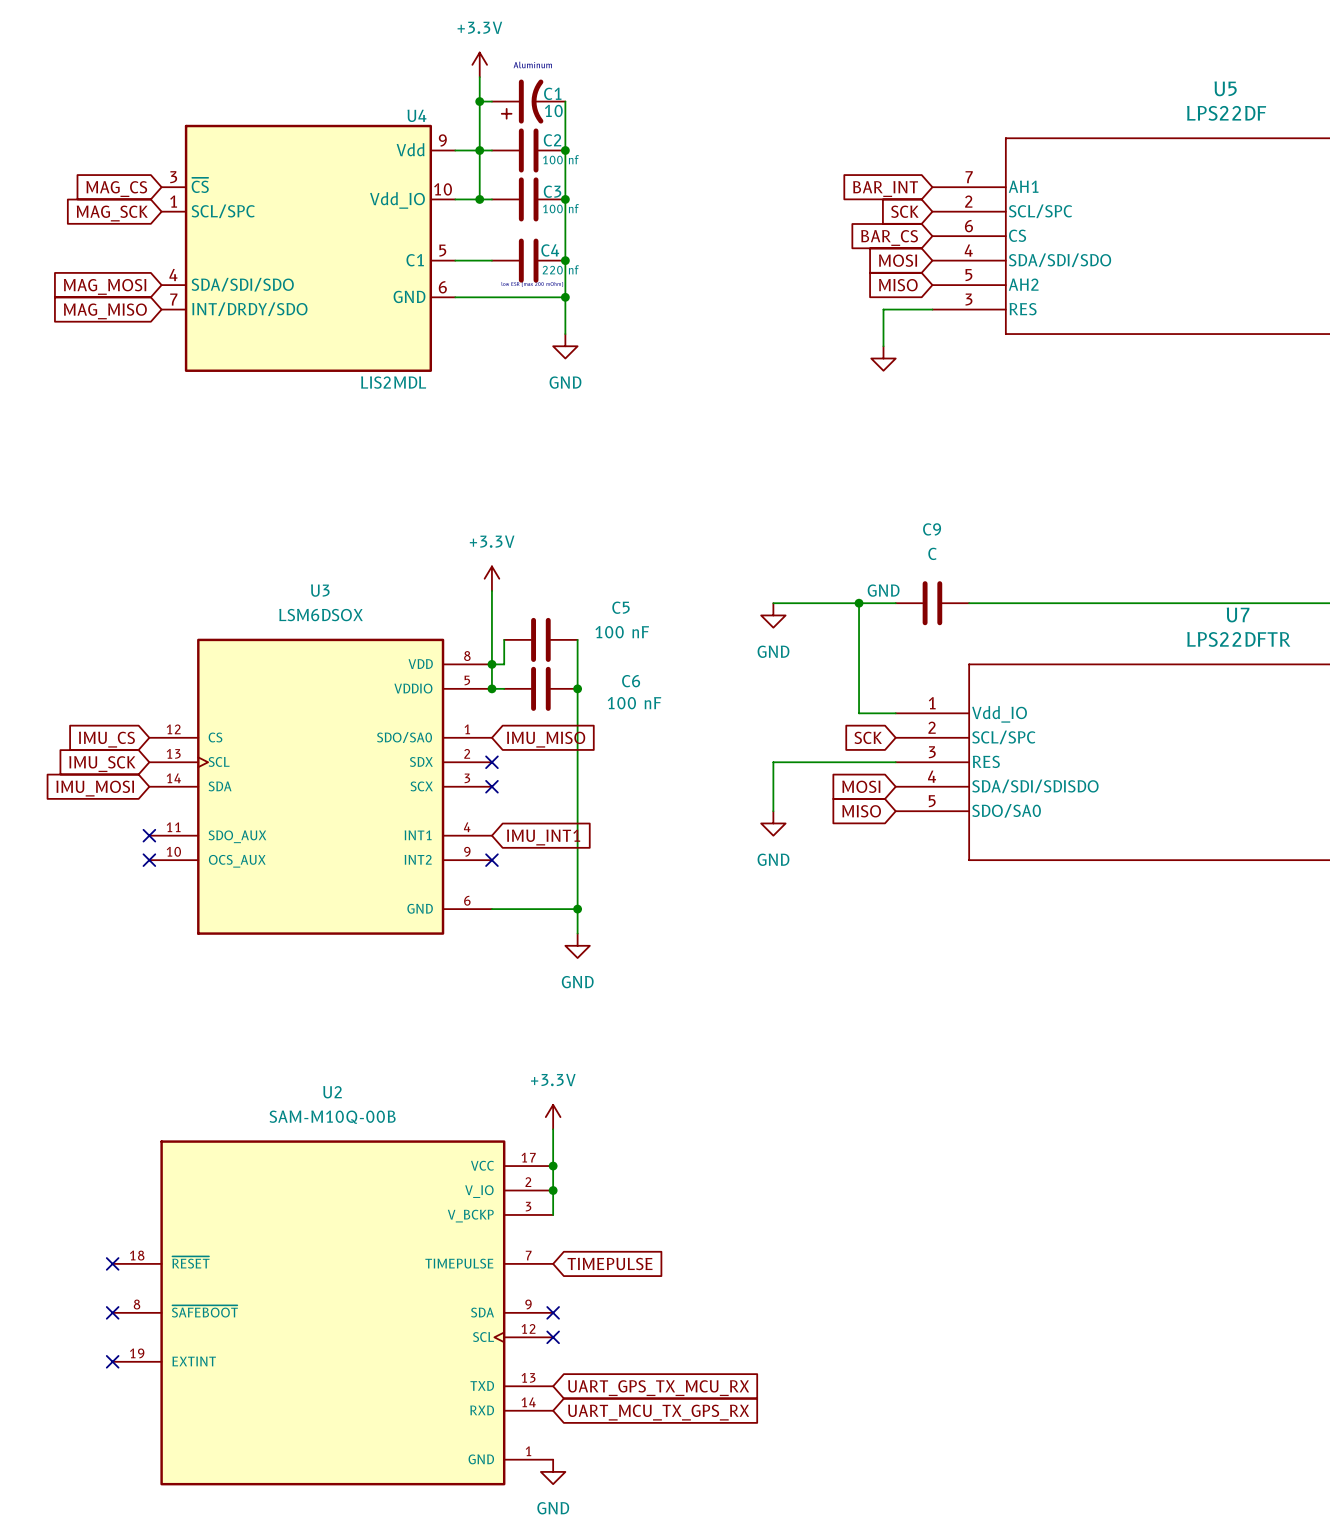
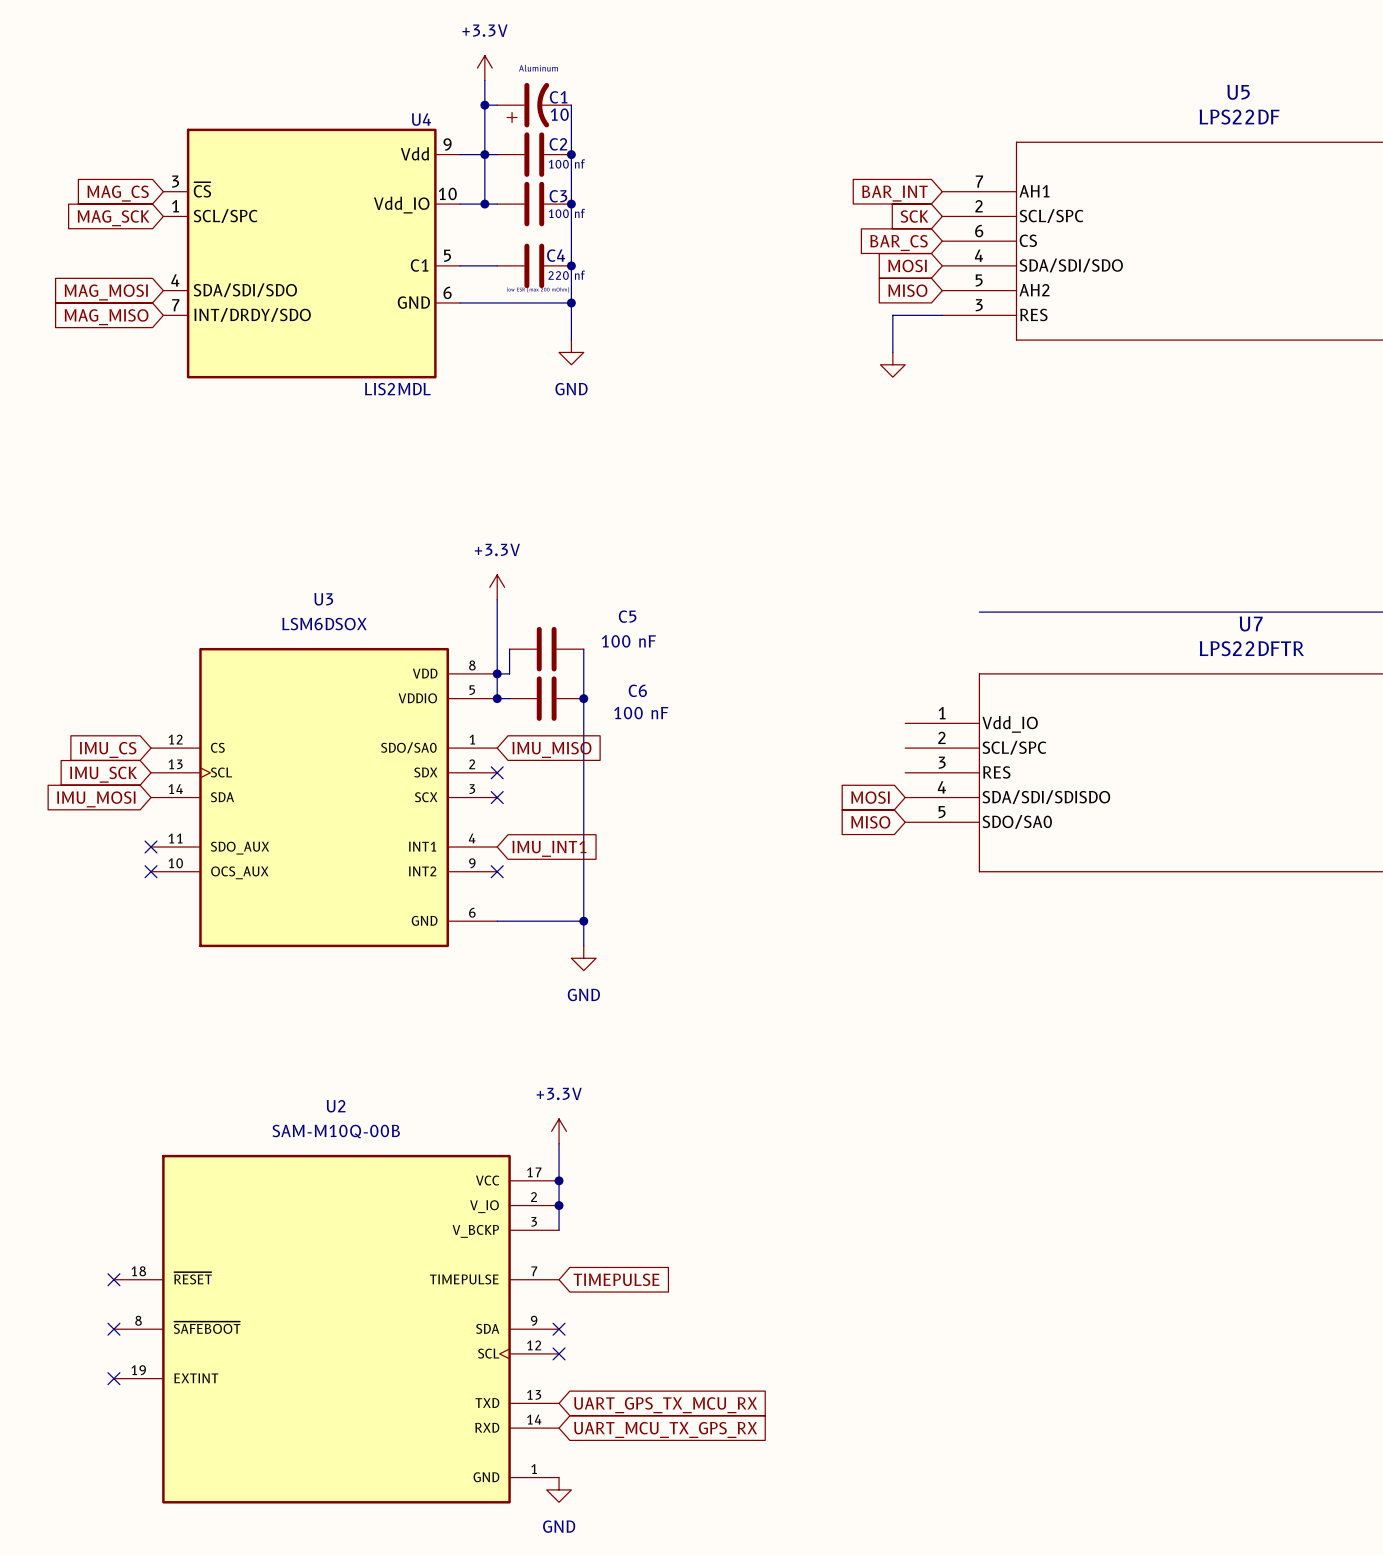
power symbol text: GND (883, 590) -> none
wire: (773, 603) (895, 603) -> none
wire: (859, 603) (859, 713) (895, 713) -> none
junction: (859, 603) -> none
C9: C (932, 603) -> none
power symbol: GND (773, 615) -> none
global label: SCK (868, 737) -> none
wire: (895, 762) (773, 762) (773, 811) -> none
power symbol: GND (773, 823) -> none

